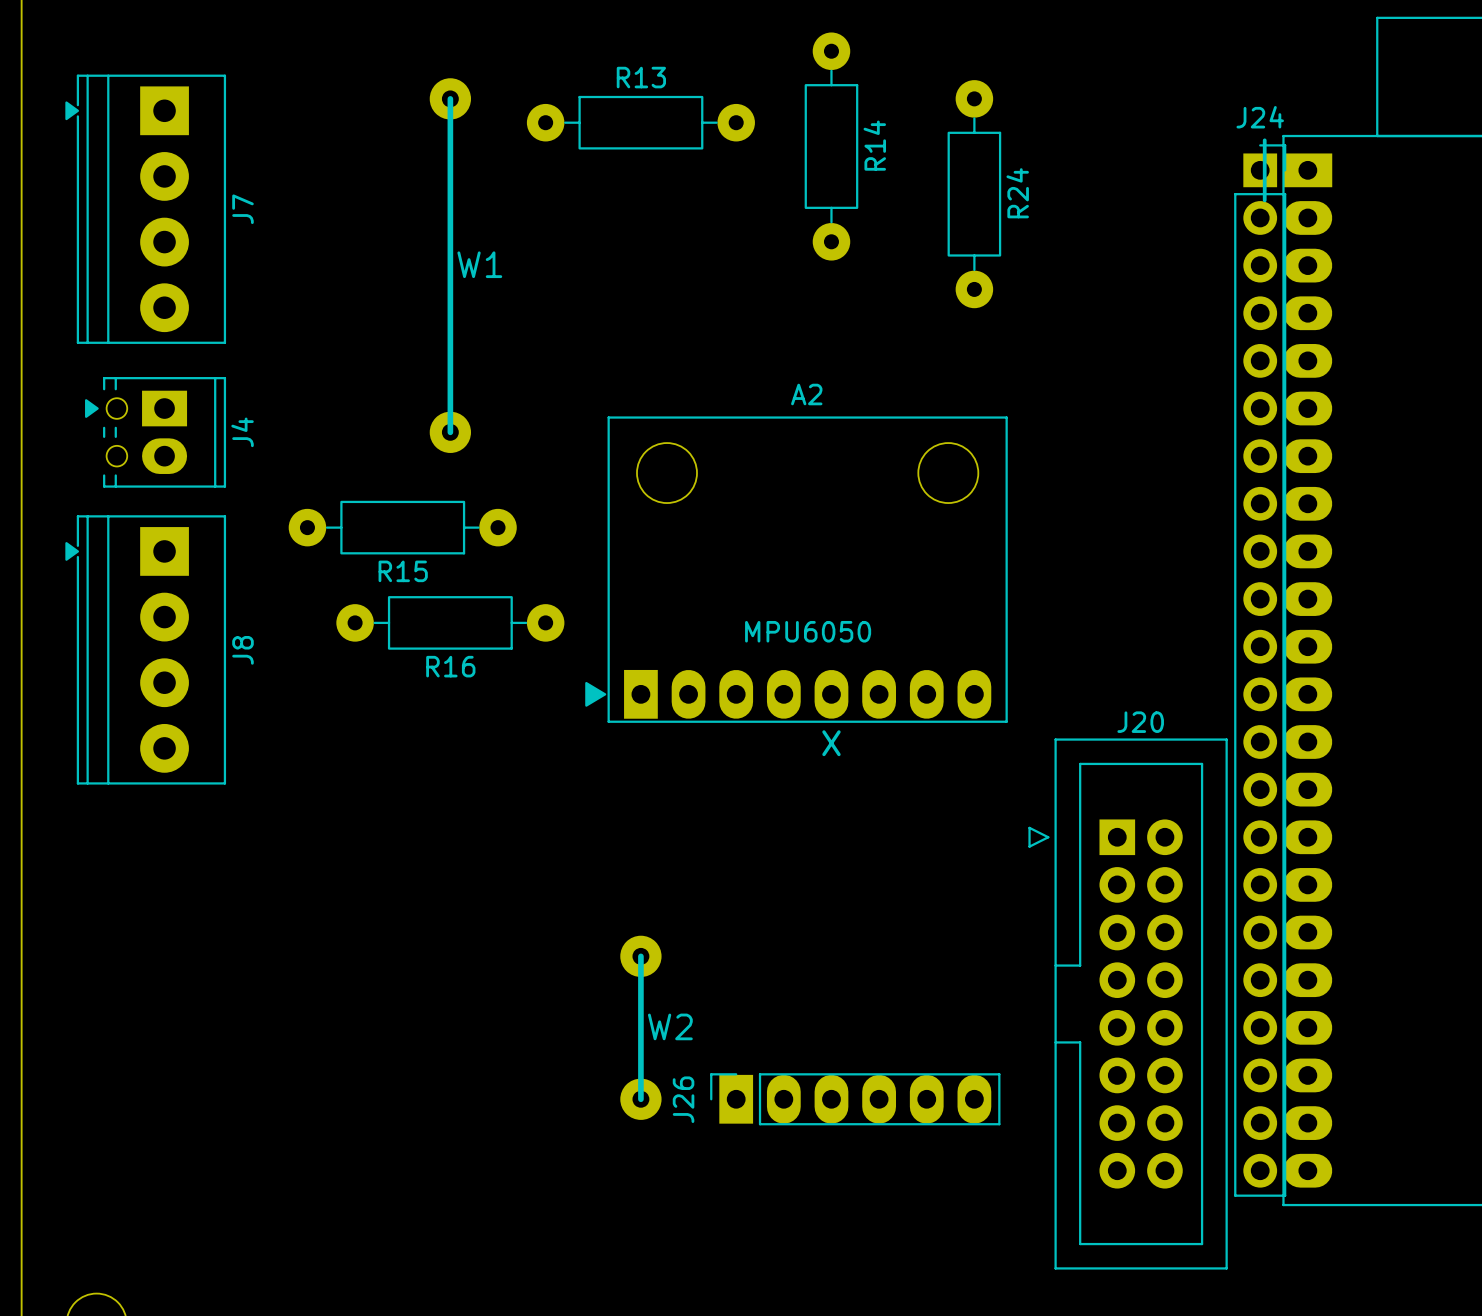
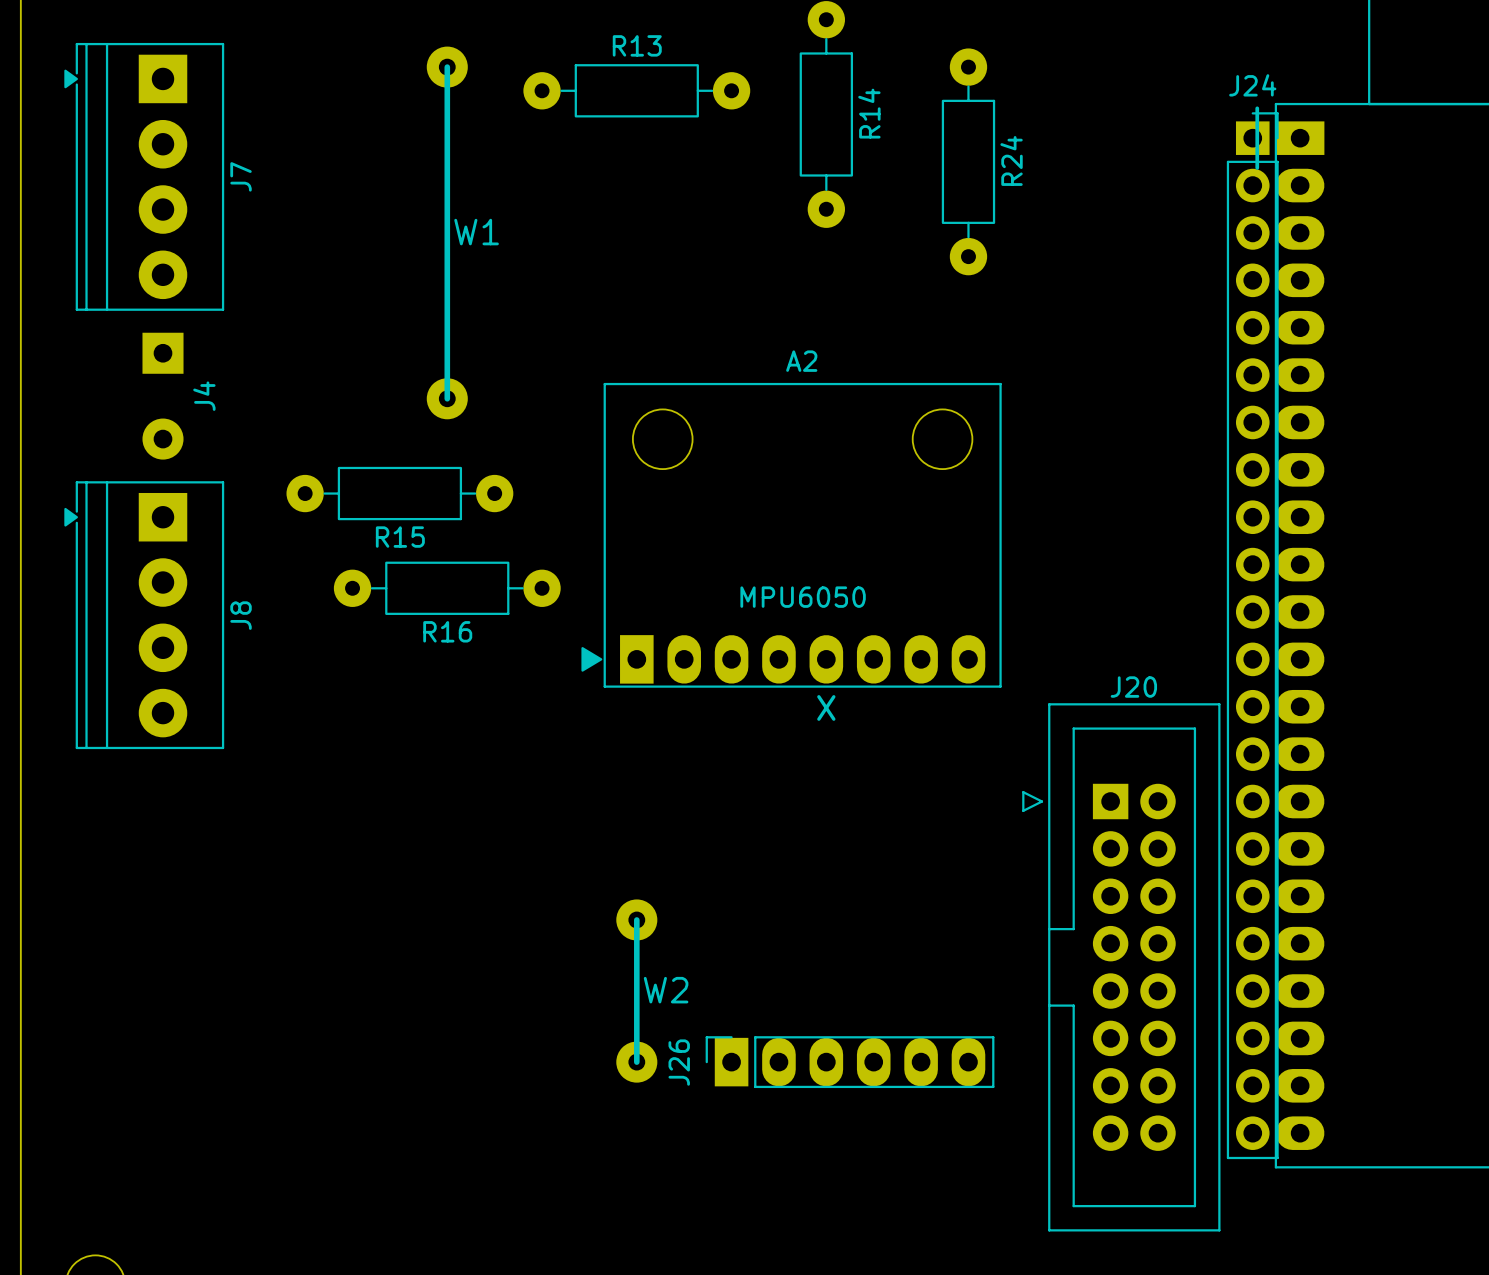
J4 footprint: [85, 377, 227, 488] -> [142, 332, 184, 460]
J4 name position: J4 (242, 432) -> J4 (204, 396)

